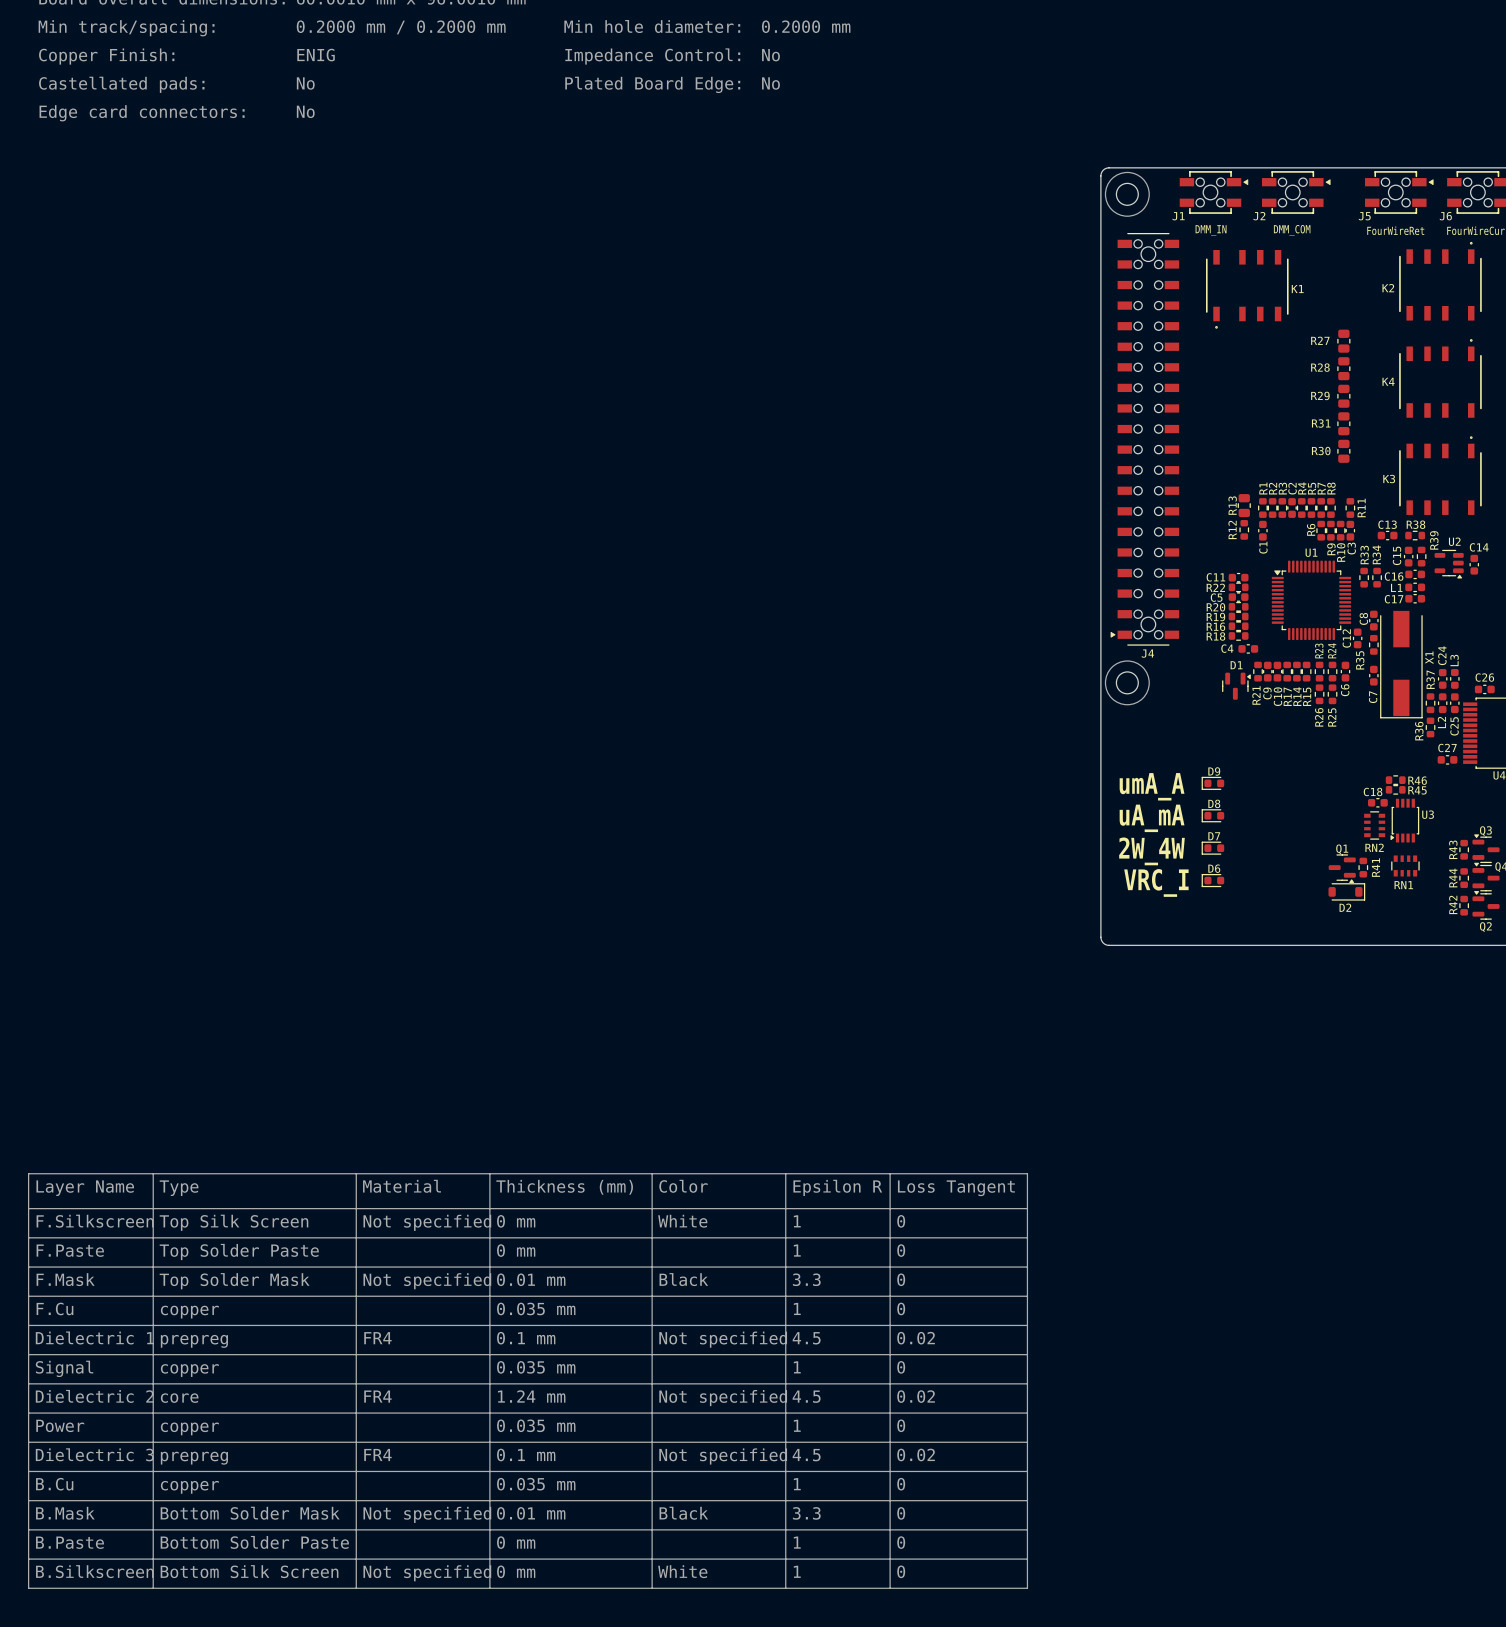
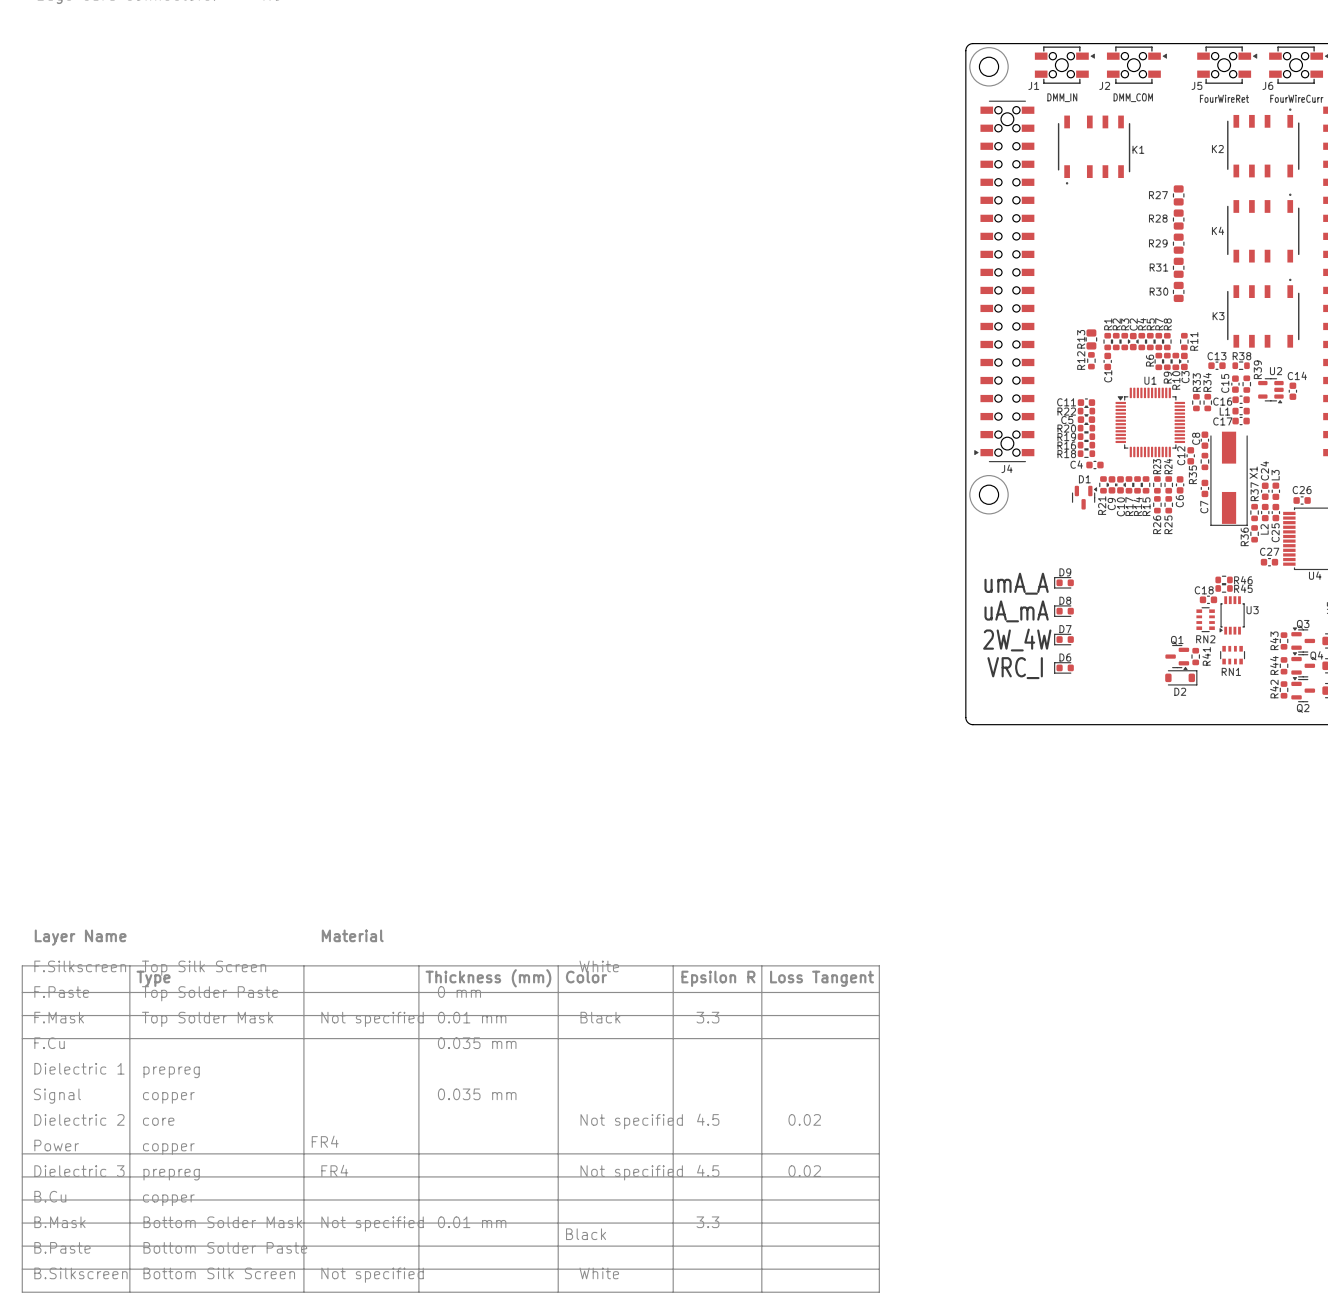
line: (28, 1173) (1027, 1173) (1027, 1588) (28, 1588) (28, 1173) -> (22, 965) (22, 1292) (879, 1292) (879, 965) (22, 965)
line: (153, 1173) (153, 1588) -> none
line: (356, 1173) (356, 1588) -> none
line: (489, 1173) (489, 1588) -> none
line: (652, 1173) (652, 1588) -> none
line: (785, 1173) (785, 1588) -> none
line: (890, 1173) (890, 1588) -> none
text position: Color (683, 1186) -> Color (586, 977)
text position: Thickness (mm) (564, 1187) -> Thickness (mm) (488, 978)
text position: Epsilon R (837, 1187) -> Epsilon R (718, 978)
text position: Type (179, 1188) -> Type (153, 978)
text position: Loss Tangent (956, 1188) -> Loss Tangent (822, 978)
line: (28, 1208) (1027, 1208) -> none
line: none -> (129, 965) (129, 1292)
line: none -> (303, 965) (303, 1292)
line: none -> (418, 965) (418, 1292)
line: none -> (558, 965) (558, 1292)
line: none -> (673, 965) (673, 1292)
line: none -> (761, 965) (761, 1292)
text: 0 mm (516, 1221) -> none
text: 1 (797, 1221) -> none
text: 0 (901, 1221) -> none
text: Not specified (427, 1222) -> none
line: (28, 1237) (1027, 1237) -> none
text: 1 (797, 1250) -> none
text: 0 (901, 1250) -> none
line: none -> (22, 992) (879, 992)
line: (28, 1267) (1027, 1267) -> none
line: none -> (22, 1015) (879, 1015)
text: 0 (901, 1279) -> none
line: (28, 1296) (1027, 1296) -> none
line: none -> (22, 1038) (879, 1038)
text: 1 (797, 1308) -> none
text: 0 (901, 1308) -> none
text: copper (189, 1312) -> none
line: (28, 1325) (1027, 1325) -> none
text: FR4 (377, 1338) -> none
text: 0.1 mm (526, 1338) -> none
text: 4.5 (806, 1338) -> none
text: 0.02 (916, 1338) -> none
text: Not specified (723, 1339) -> none
line: (28, 1354) (1027, 1354) -> none
text: 1 (797, 1367) -> none
text: 0 (901, 1367) -> none
line: (28, 1383) (1027, 1383) -> none
text position: FR4 (377, 1396) -> FR4 (325, 1141)
text: 1.24 mm (531, 1396) -> none
line: (28, 1413) (1027, 1413) -> none
text: 0.035 mm (536, 1425) -> none
text: 1 (797, 1425) -> none
text: 0 (901, 1425) -> none
line: none -> (22, 1153) (879, 1153)
line: (28, 1442) (1027, 1442) -> none
text: 0.1 mm (526, 1454) -> none
line: none -> (22, 1176) (879, 1176)
line: (28, 1471) (1027, 1471) -> none
text: 0.035 mm (536, 1484) -> none
text: 1 (797, 1484) -> none
text: 0 (901, 1484) -> none
line: none -> (22, 1199) (879, 1199)
line: (28, 1500) (1027, 1500) -> none
text position: Black (683, 1513) -> Black (586, 1234)
text: 0 (901, 1513) -> none
line: none -> (22, 1223) (879, 1223)
line: (28, 1529) (1027, 1529) -> none
line: none -> (22, 1246) (879, 1246)
text: 0 mm (516, 1542) -> none
text: 1 (797, 1542) -> none
text: 0 (901, 1542) -> none
line: (28, 1559) (1027, 1559) -> none
line: none -> (22, 1269) (879, 1269)
text: 0 mm (516, 1571) -> none
text: 1 (797, 1571) -> none
text: 0 (901, 1571) -> none

